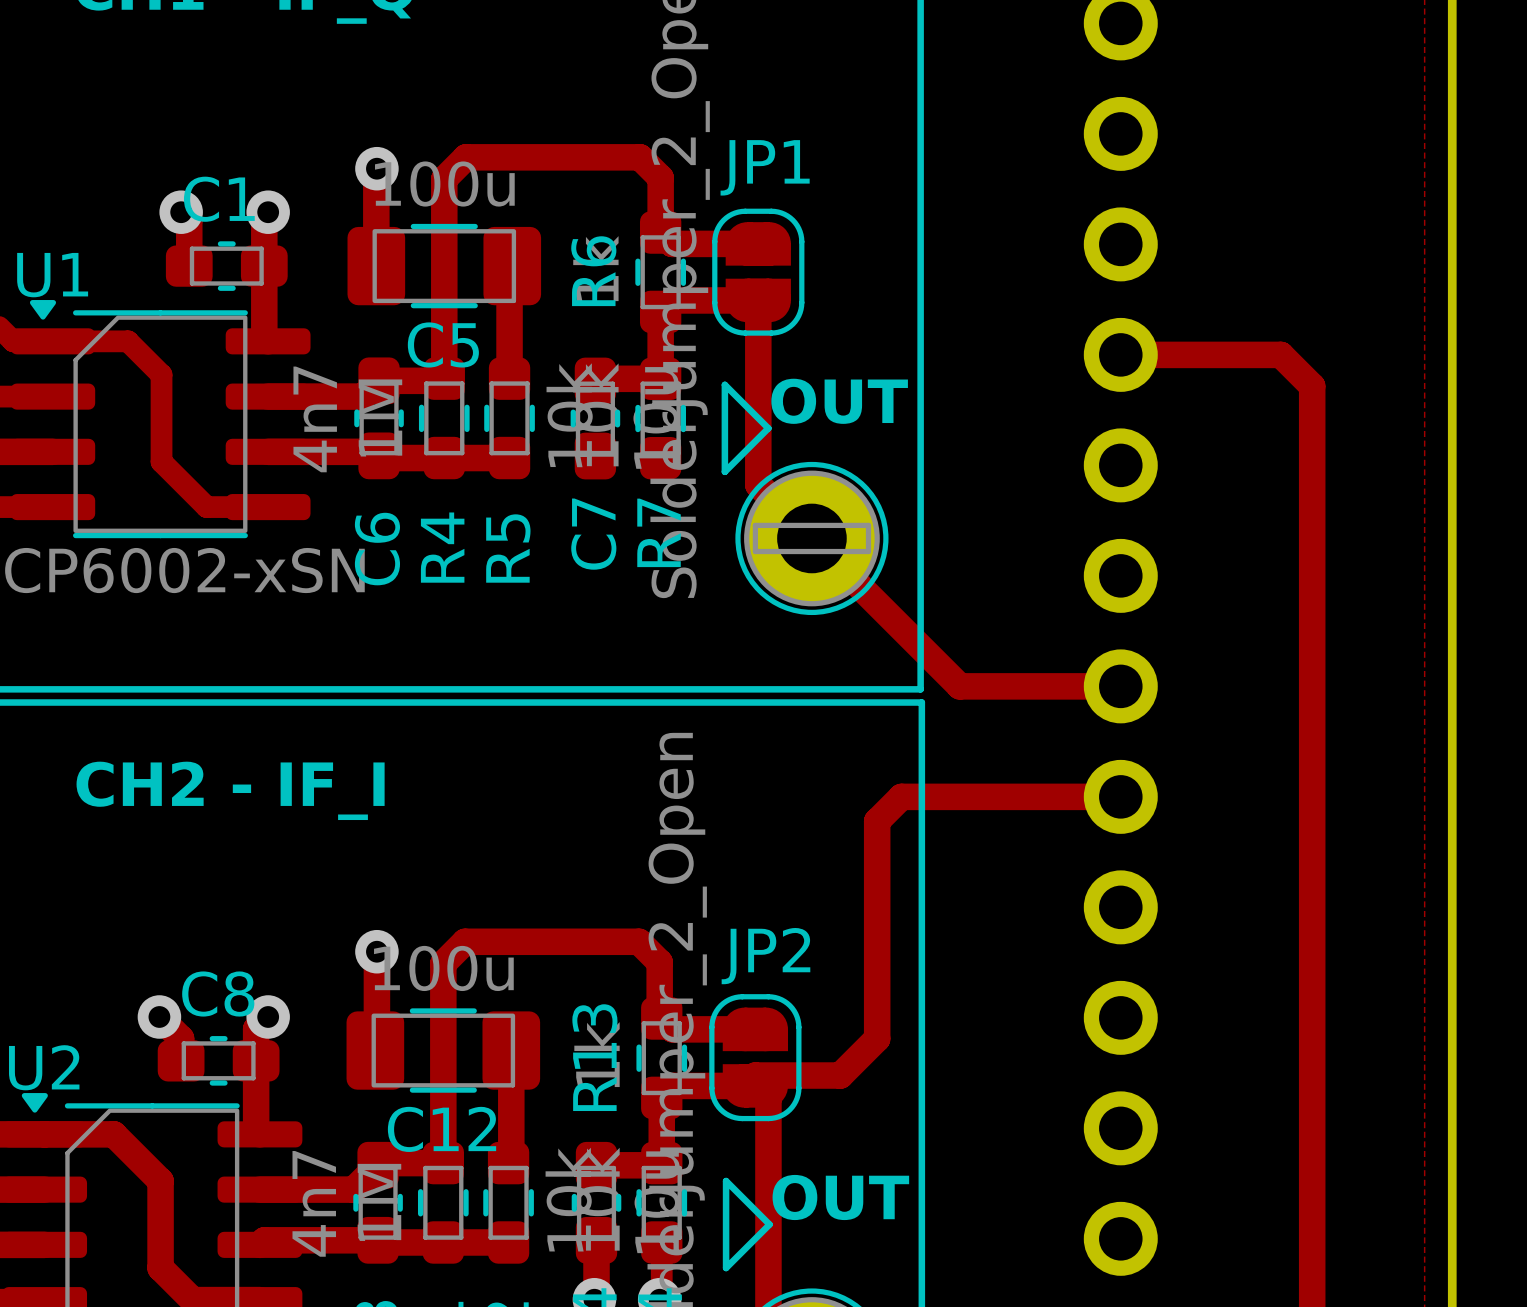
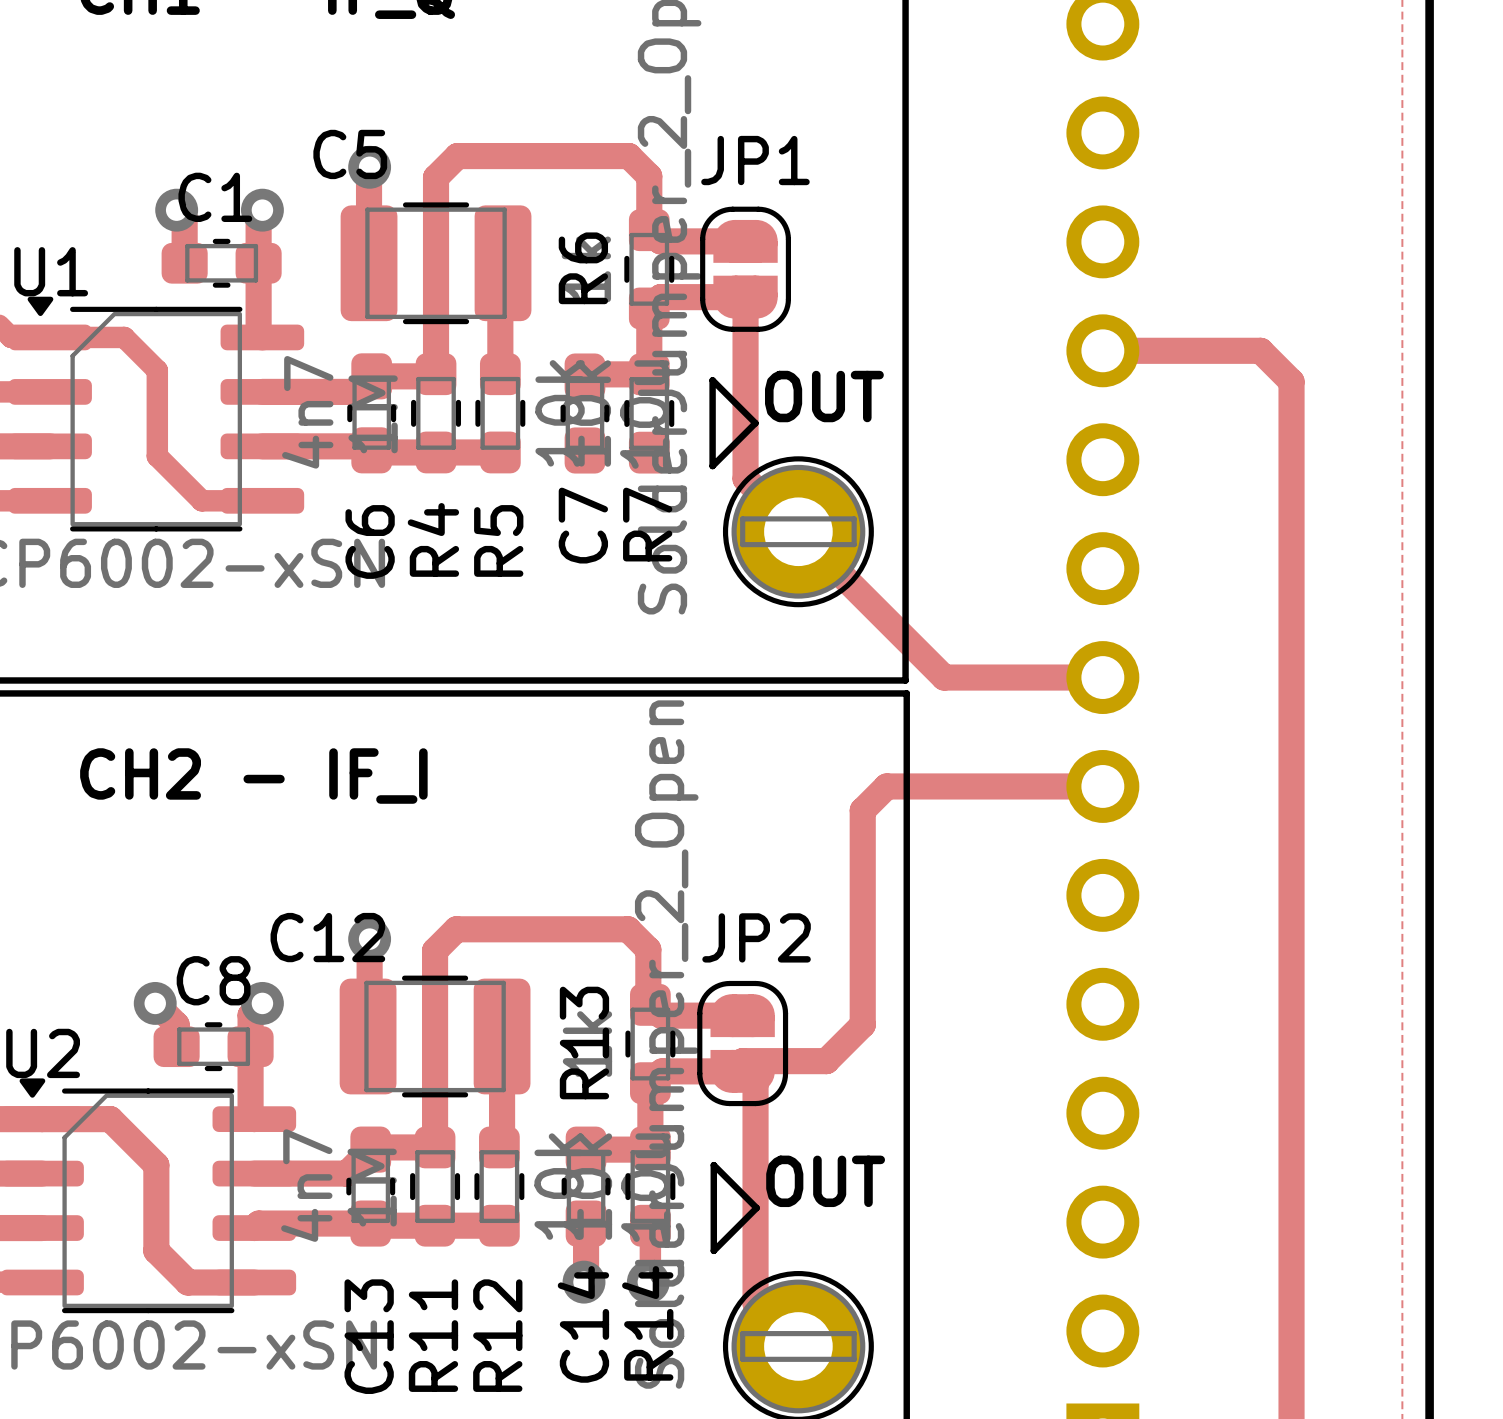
C5 value: 100u (444, 184) -> none
C5 footprint: [347, 223, 542, 309] -> [340, 202, 532, 325]
C5 name position: C5 (443, 344) -> C5 (350, 154)
C12 value: 100u (443, 968) -> none
C12 footprint: [346, 1008, 541, 1093] -> [339, 975, 531, 1098]
C12 name position: C12 (442, 1129) -> C12 (327, 937)

